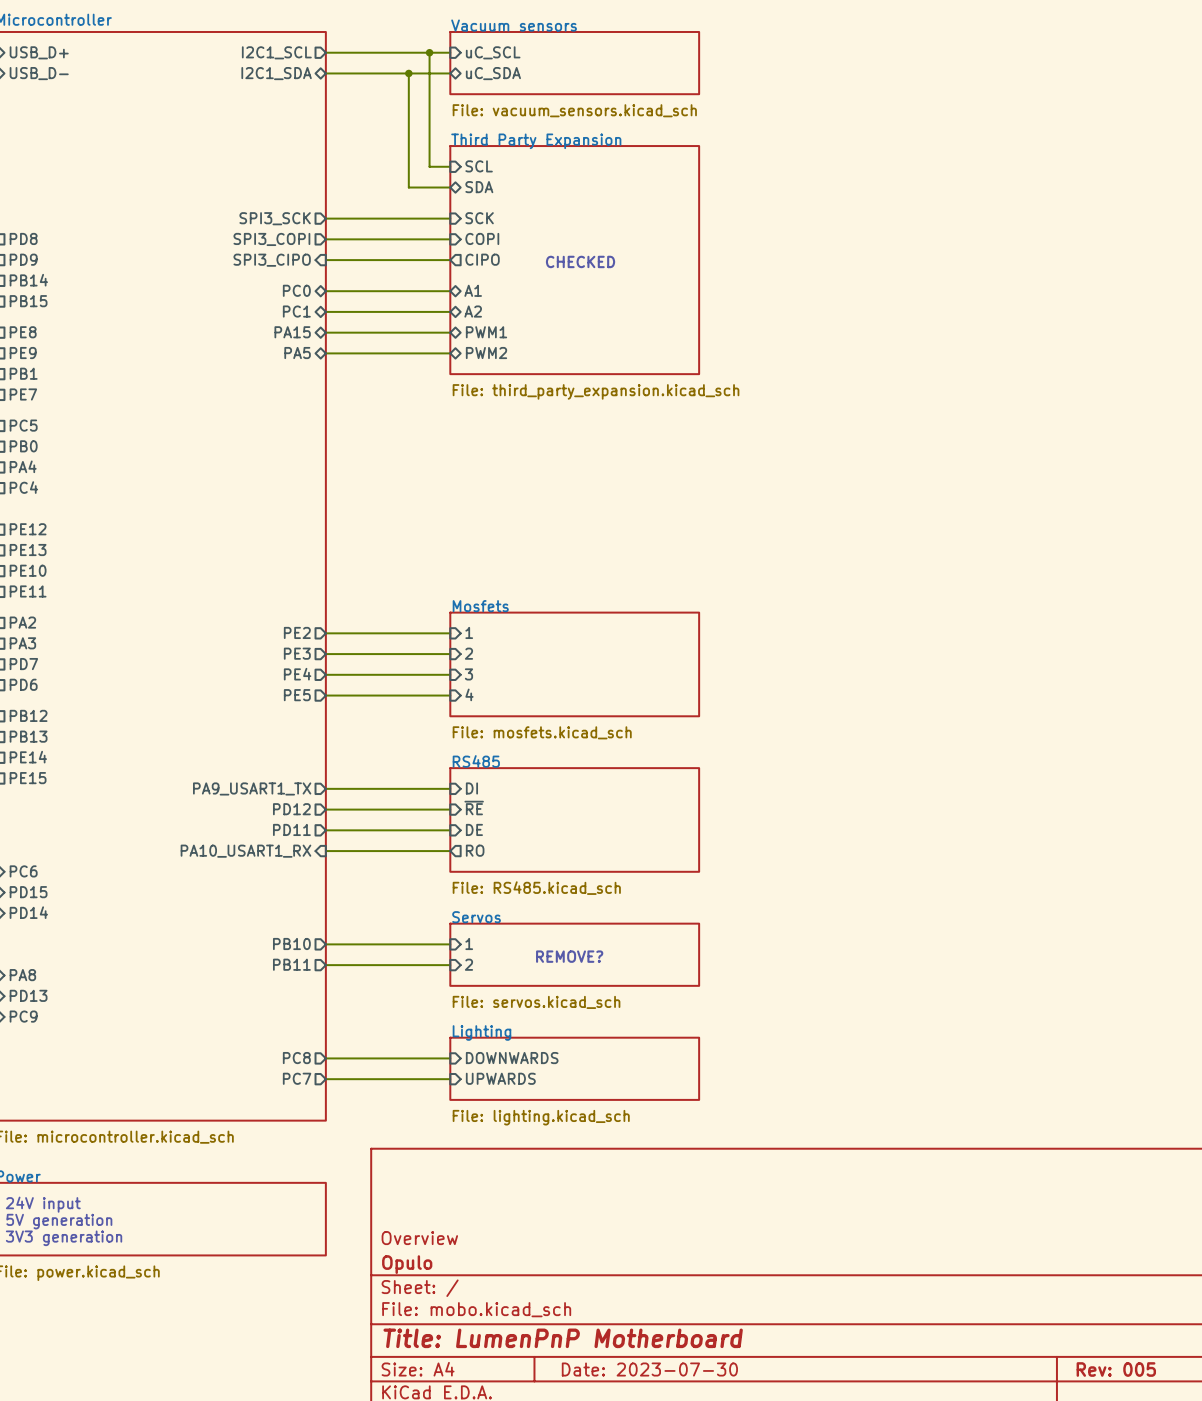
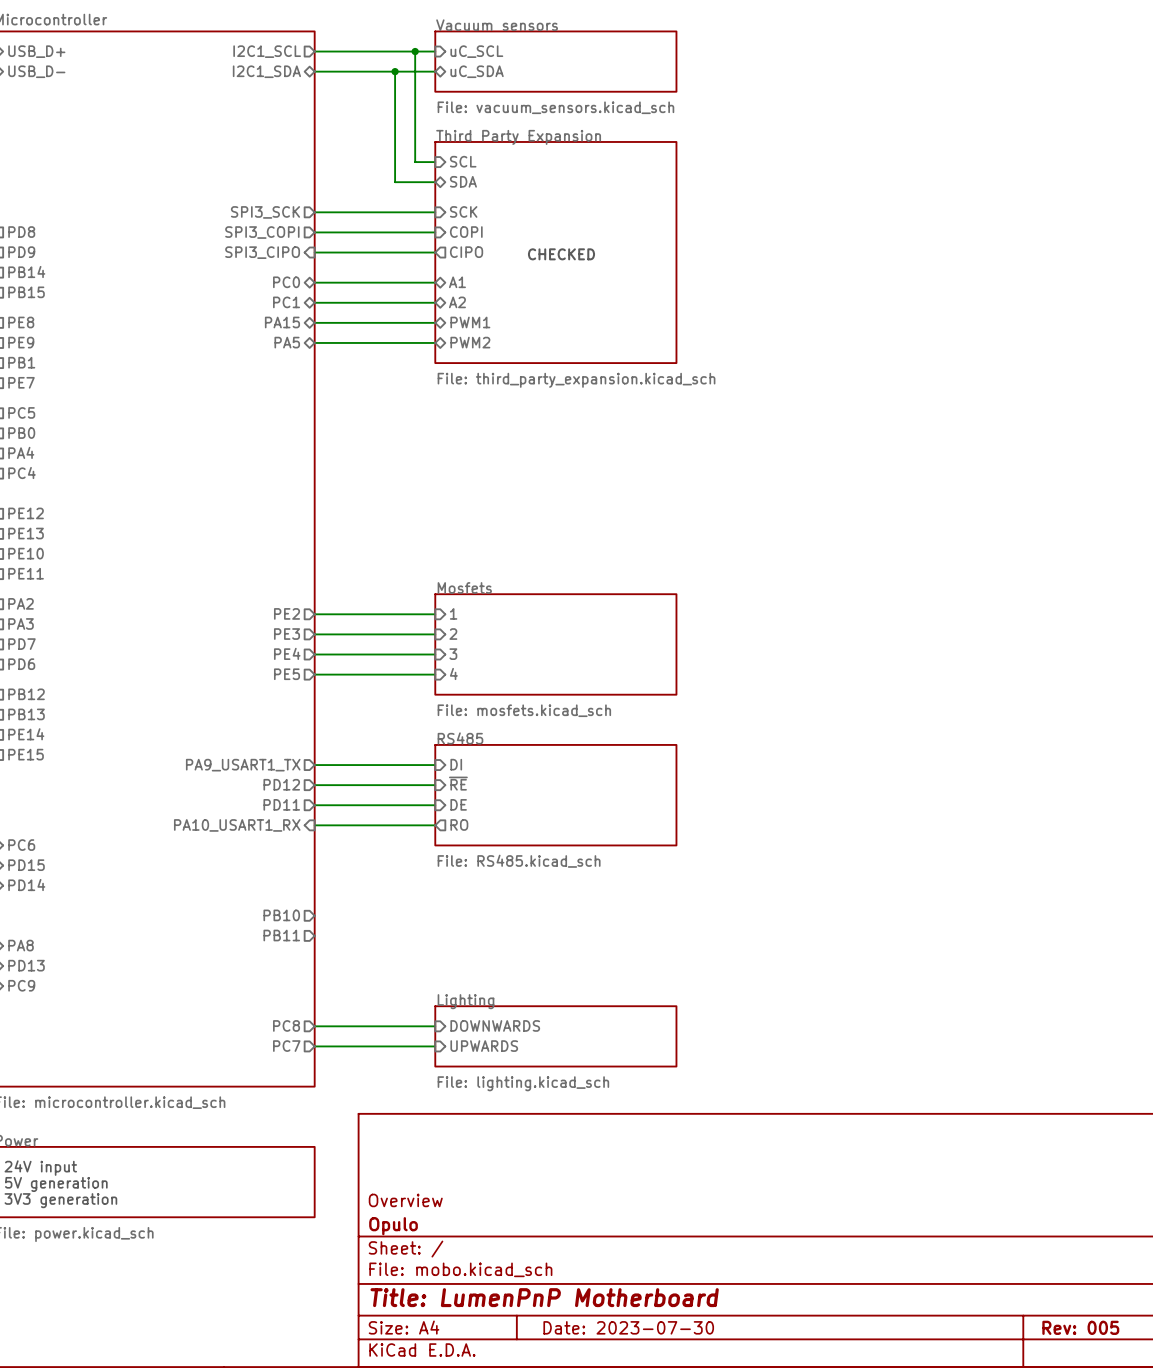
sheet pin: 1 (469, 943) -> none
wire: (325, 944) (450, 944) -> none
sheet Servos: File: servos.kicad_sch (574, 954) -> none
text: REMOVE? (569, 956) -> none
sheet pin: 2 (468, 964) -> none
wire: (325, 965) (450, 965) -> none

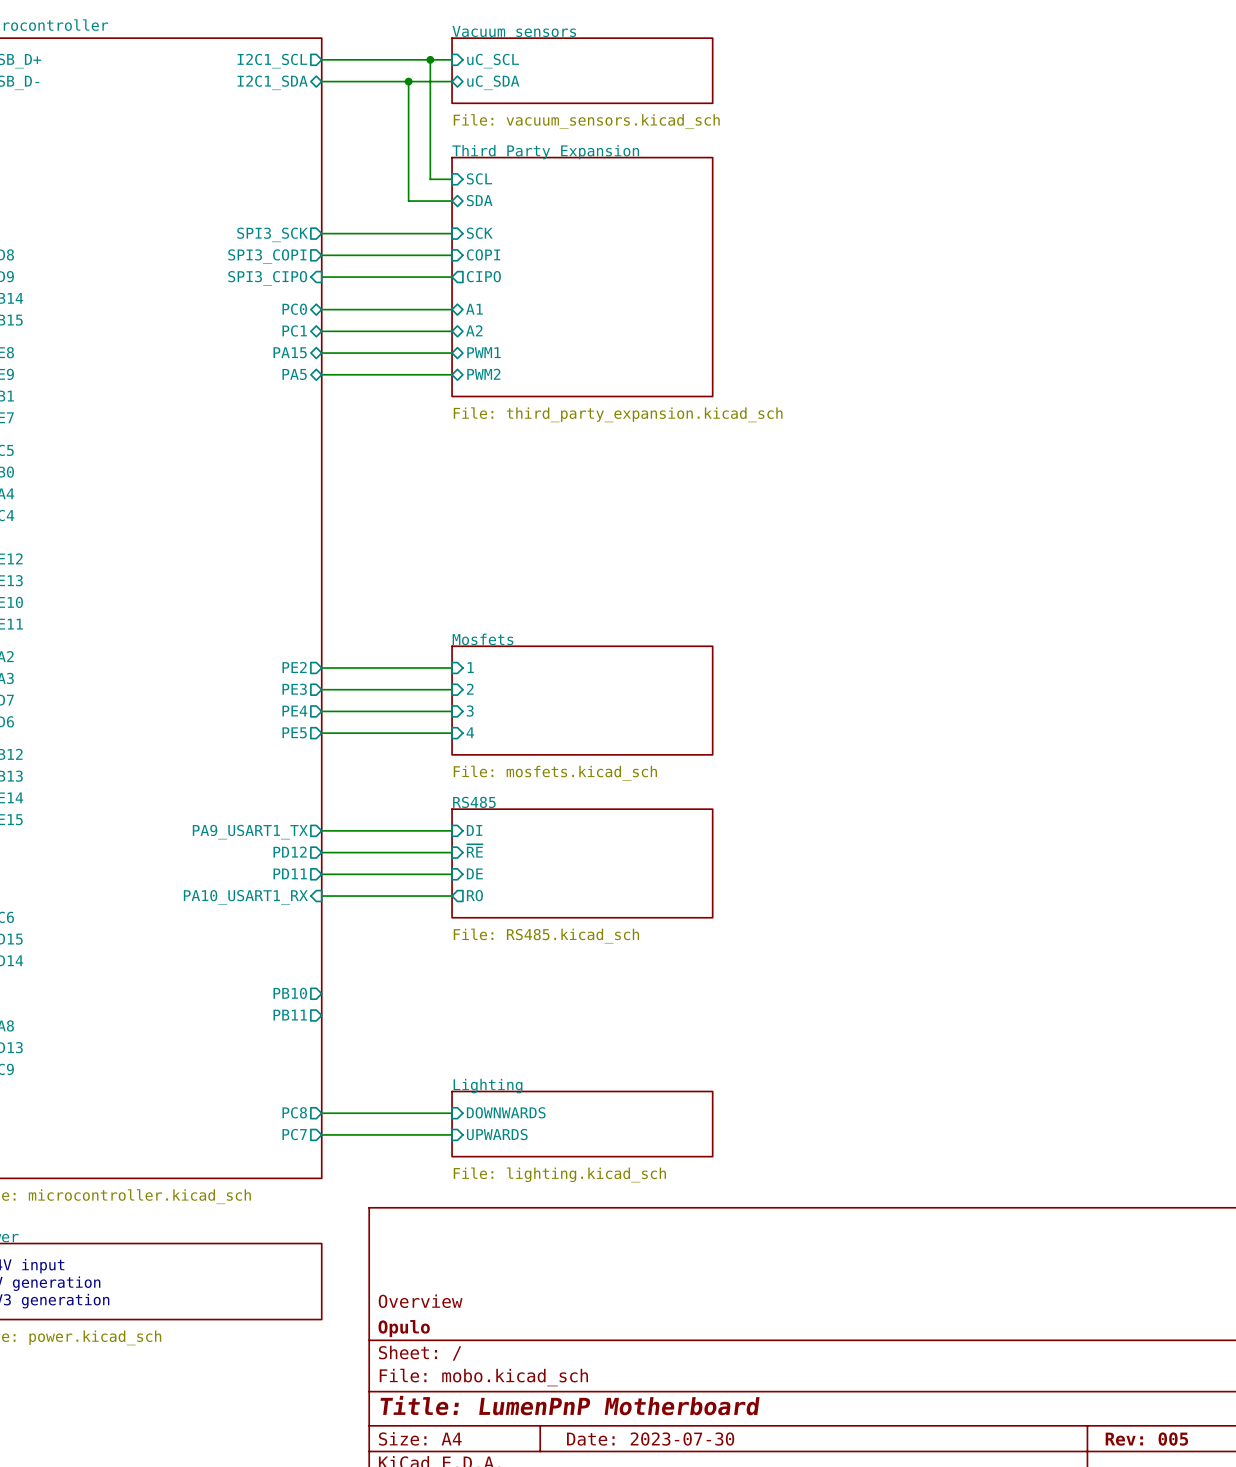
text: CHECKED (561, 254) -> none

